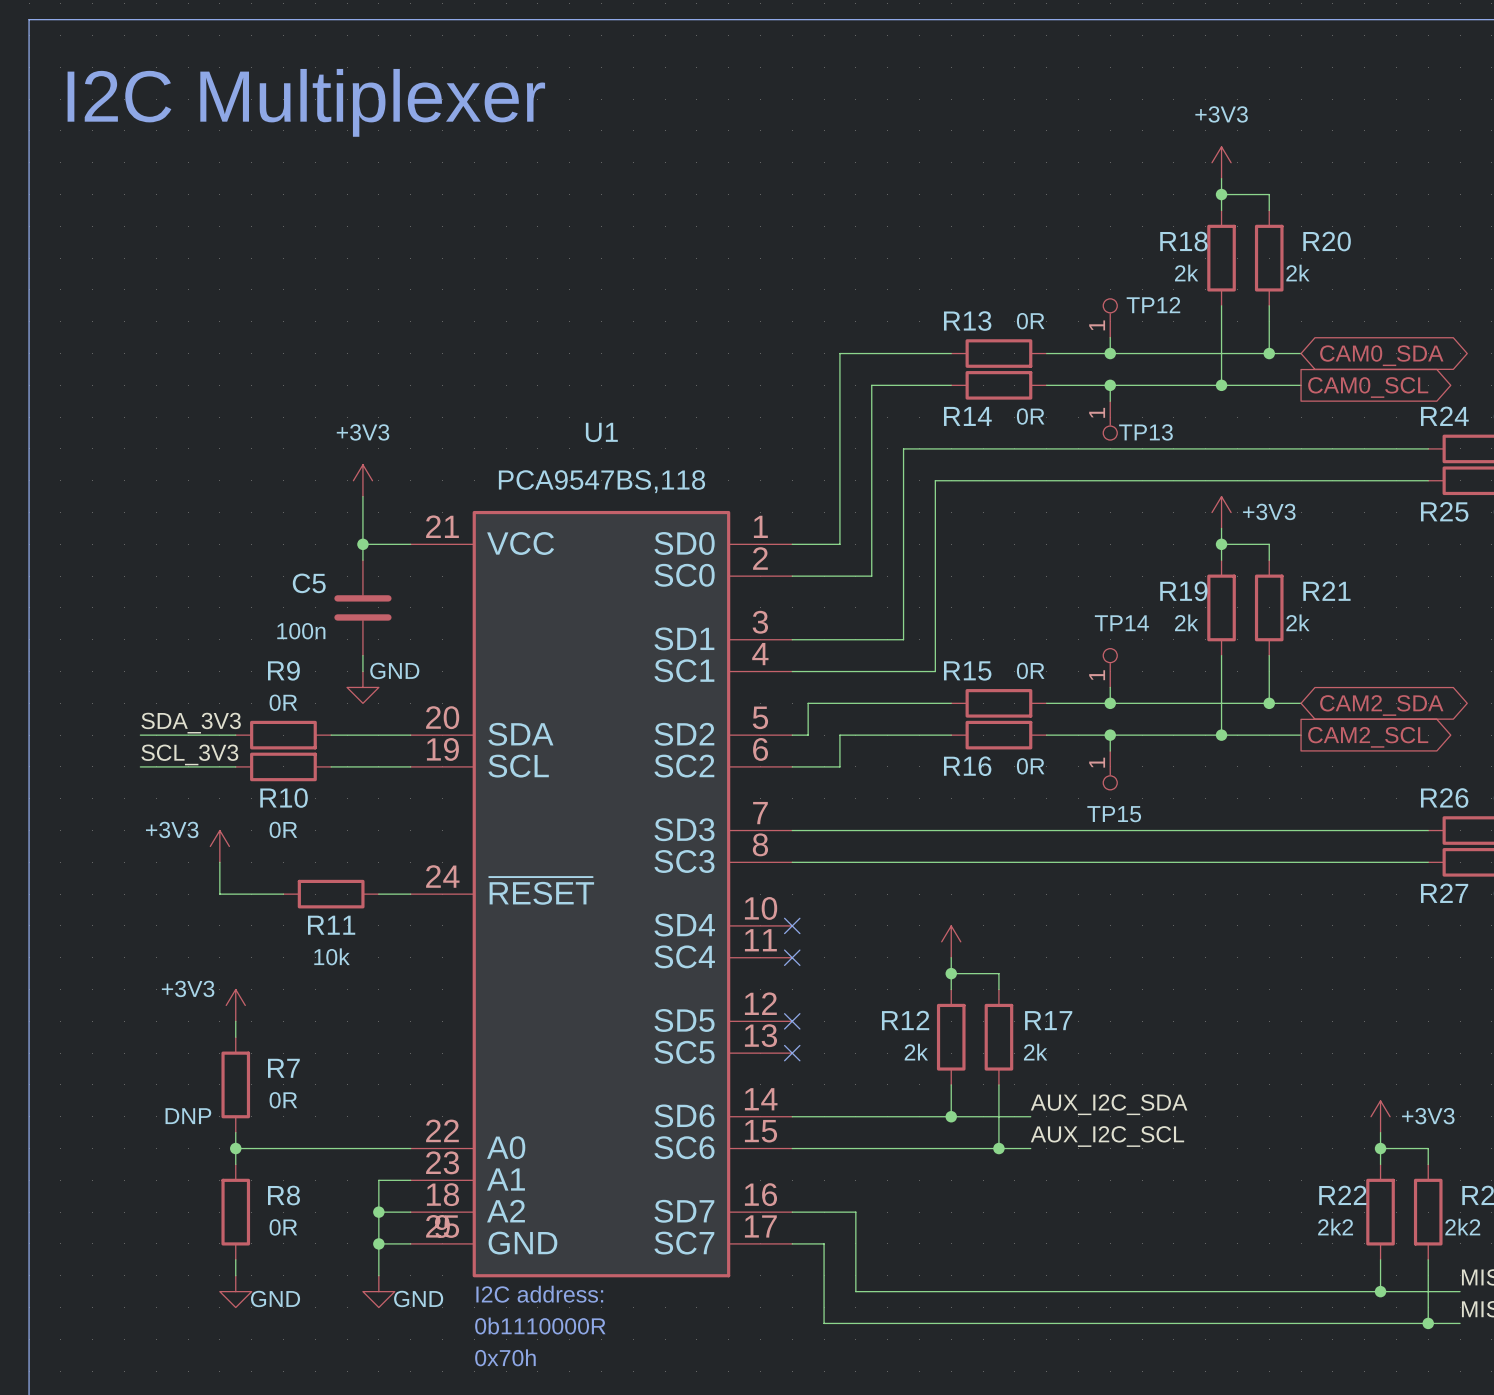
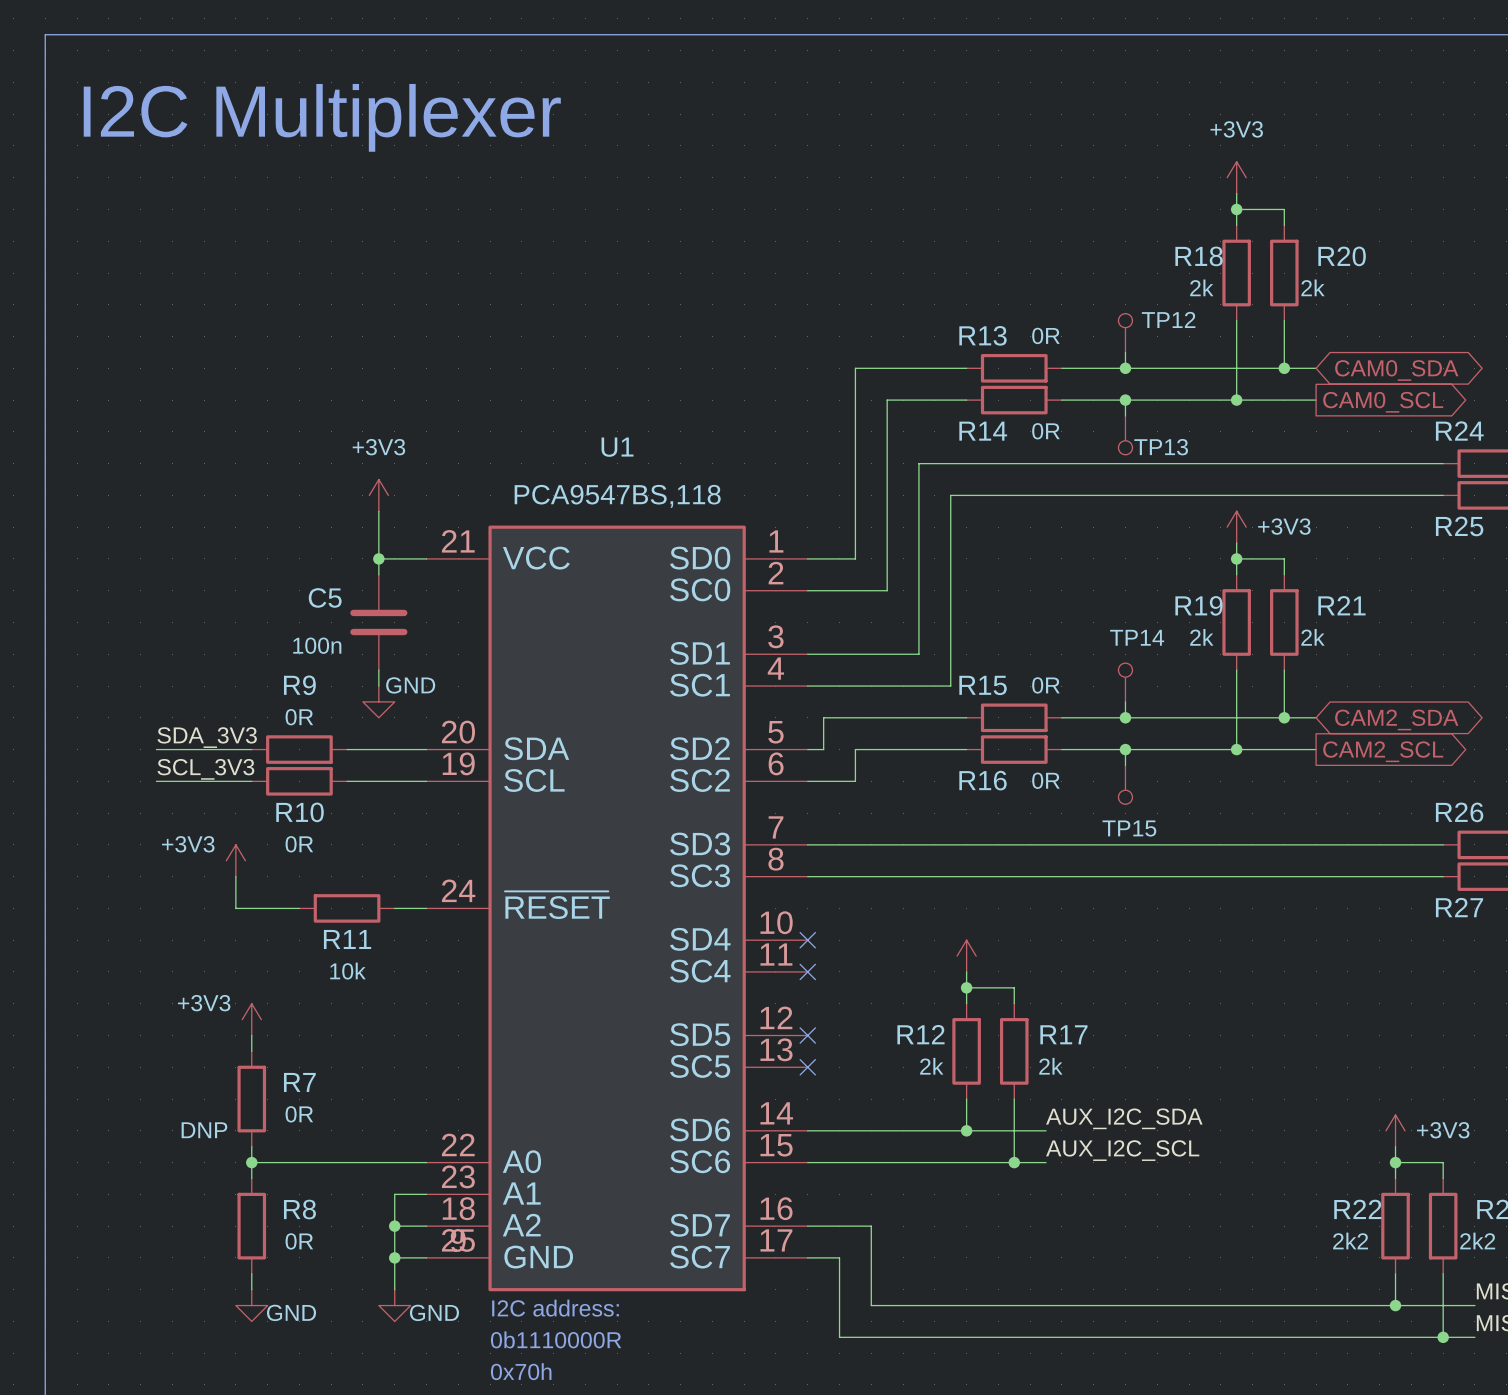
TP12 pin number: 1 (1097, 325) -> none
TP13 pin number: 1 (1097, 412) -> none
TP14 pin number: 1 (1097, 675) -> none
TP15 pin number: 1 (1097, 762) -> none

